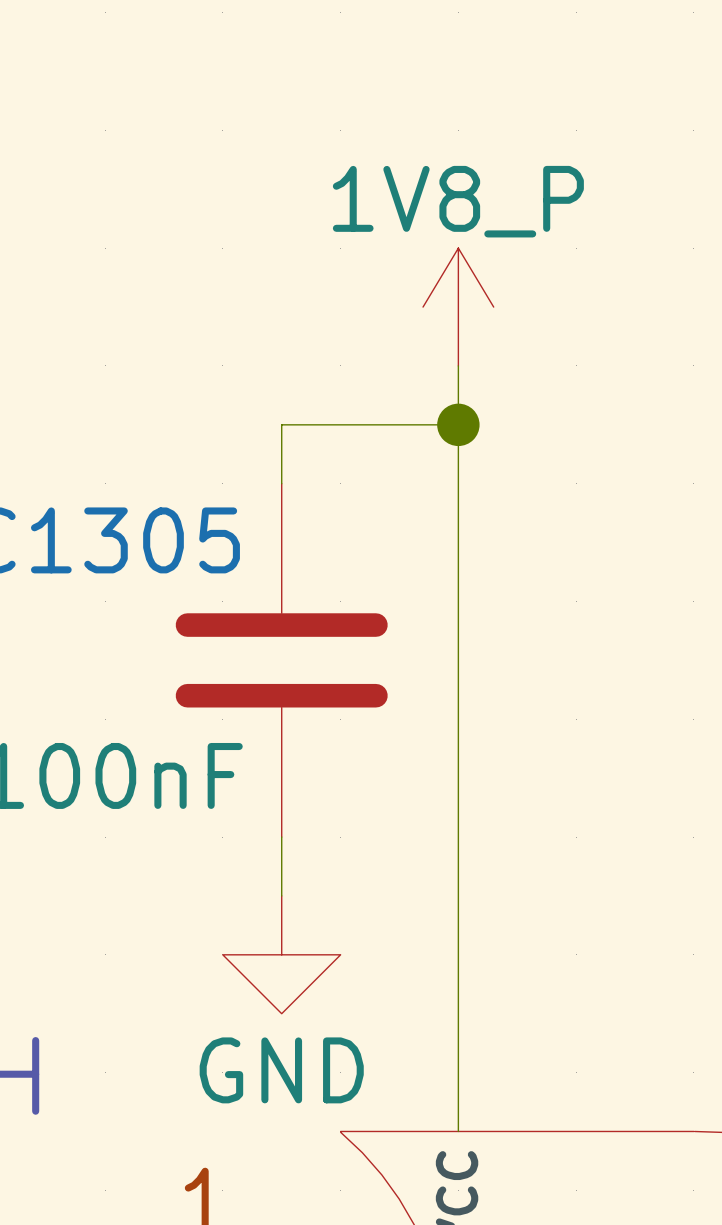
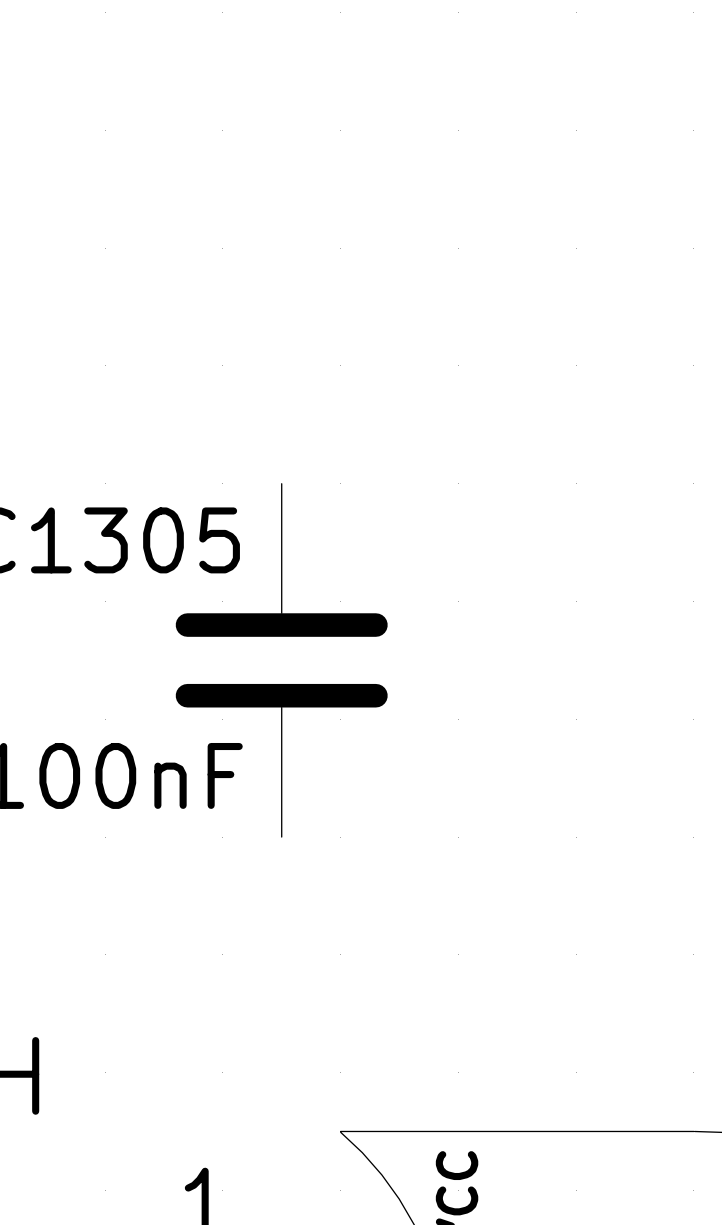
power symbol: 1V8_P (458, 307) -> none
wire: (458, 365) (458, 1131) -> none
wire: (458, 424) (281, 424) (281, 483) -> none
junction: (458, 424) -> none
wire: (281, 837) (281, 895) -> none
power symbol: GND (281, 954) -> none

